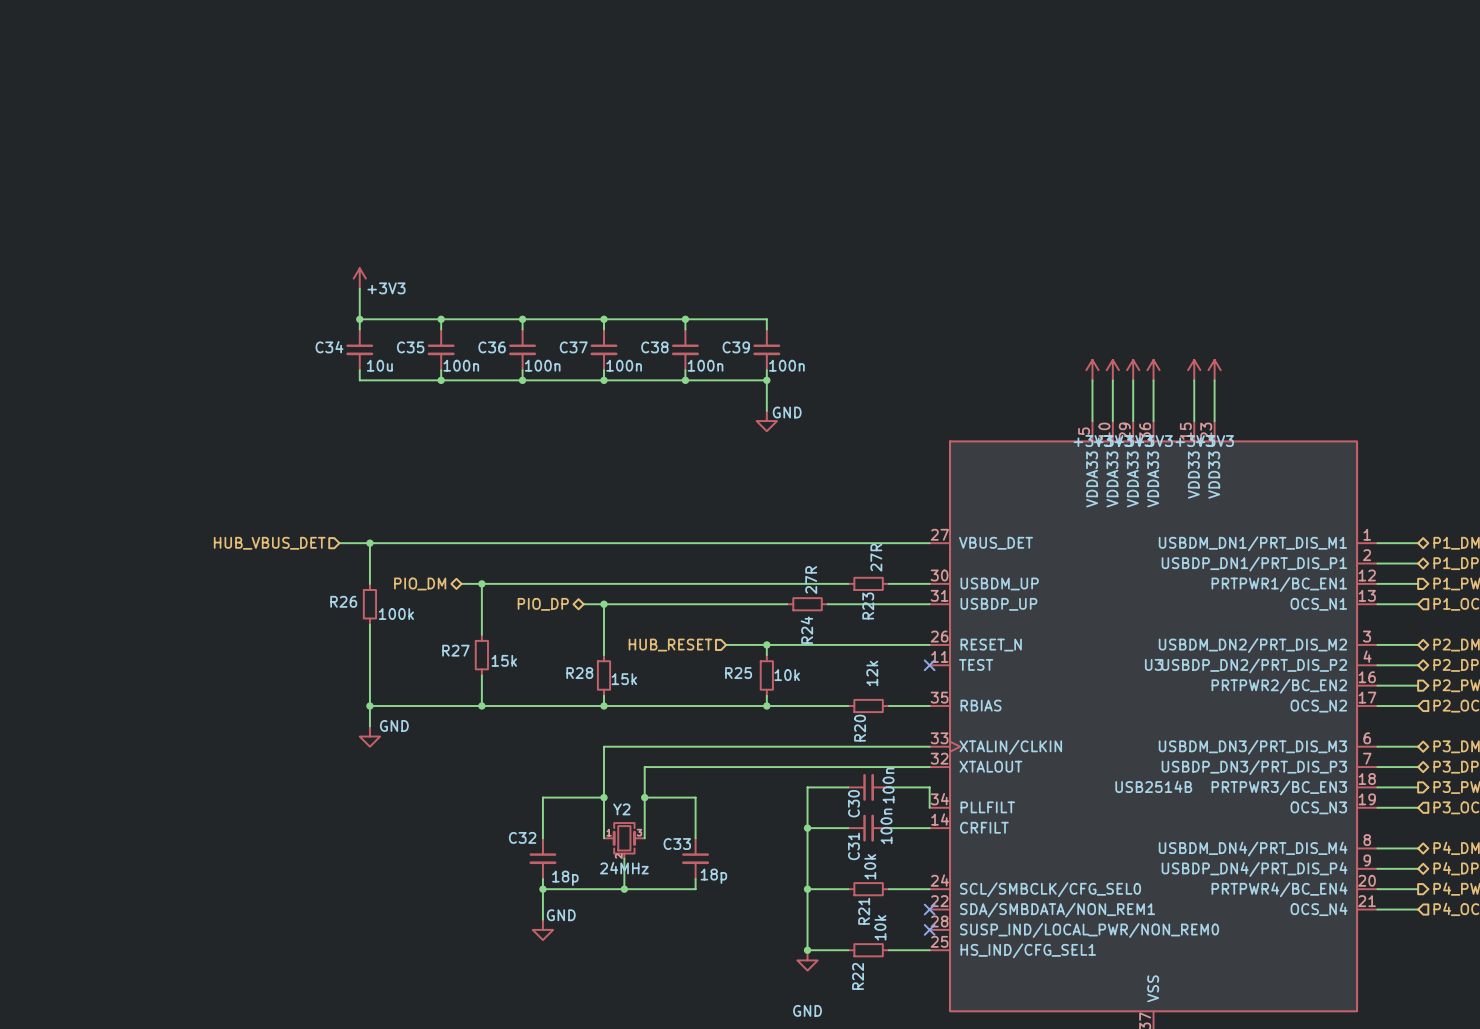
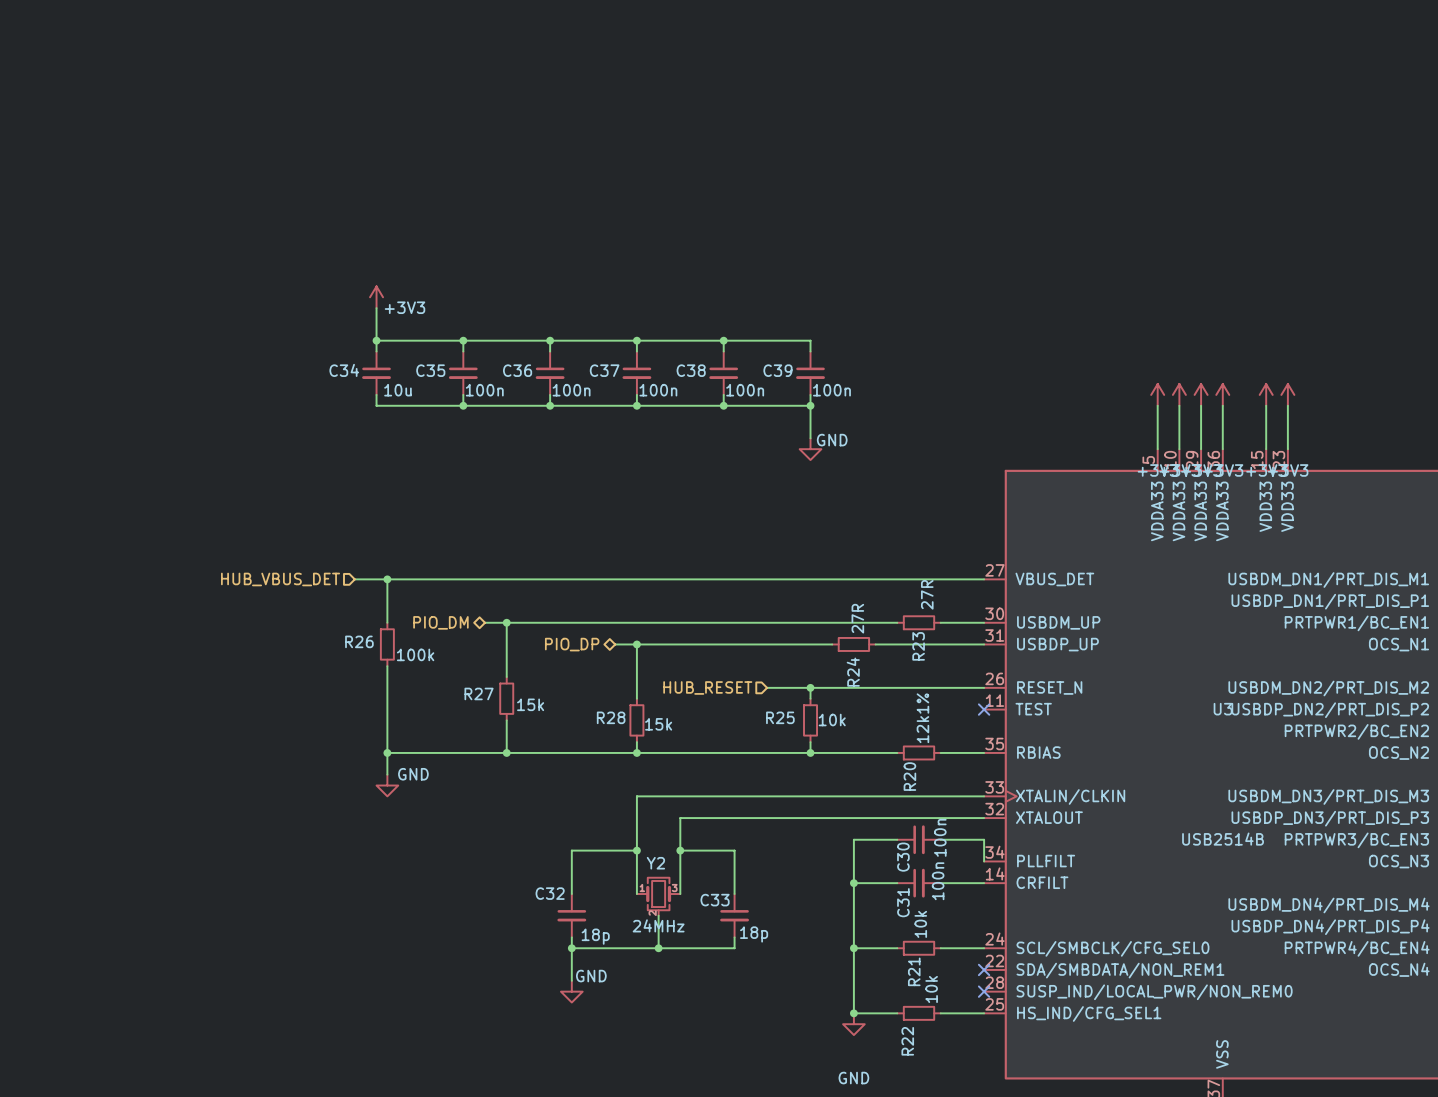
R20 value: 12k (872, 673) -> 12k1% (922, 718)

